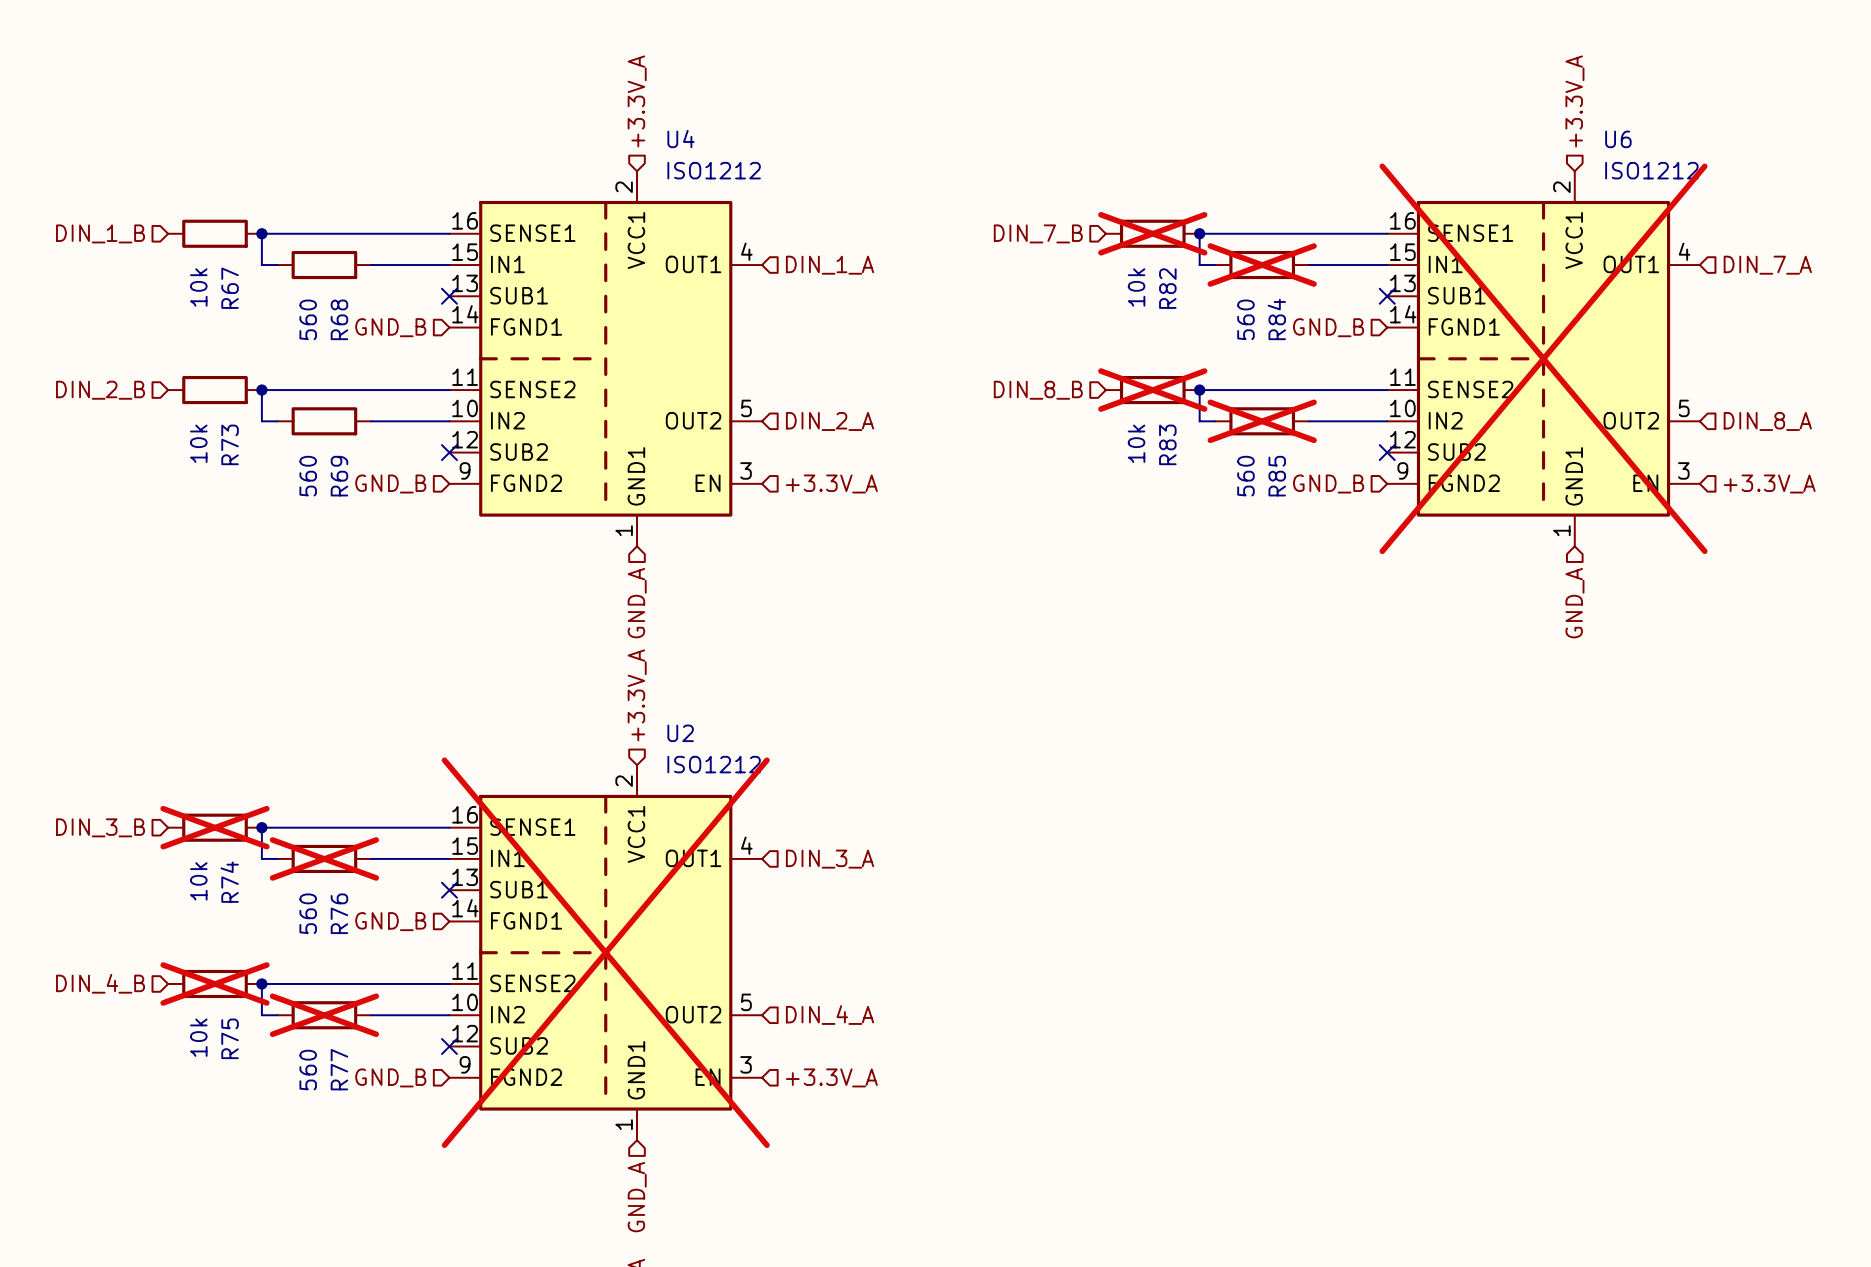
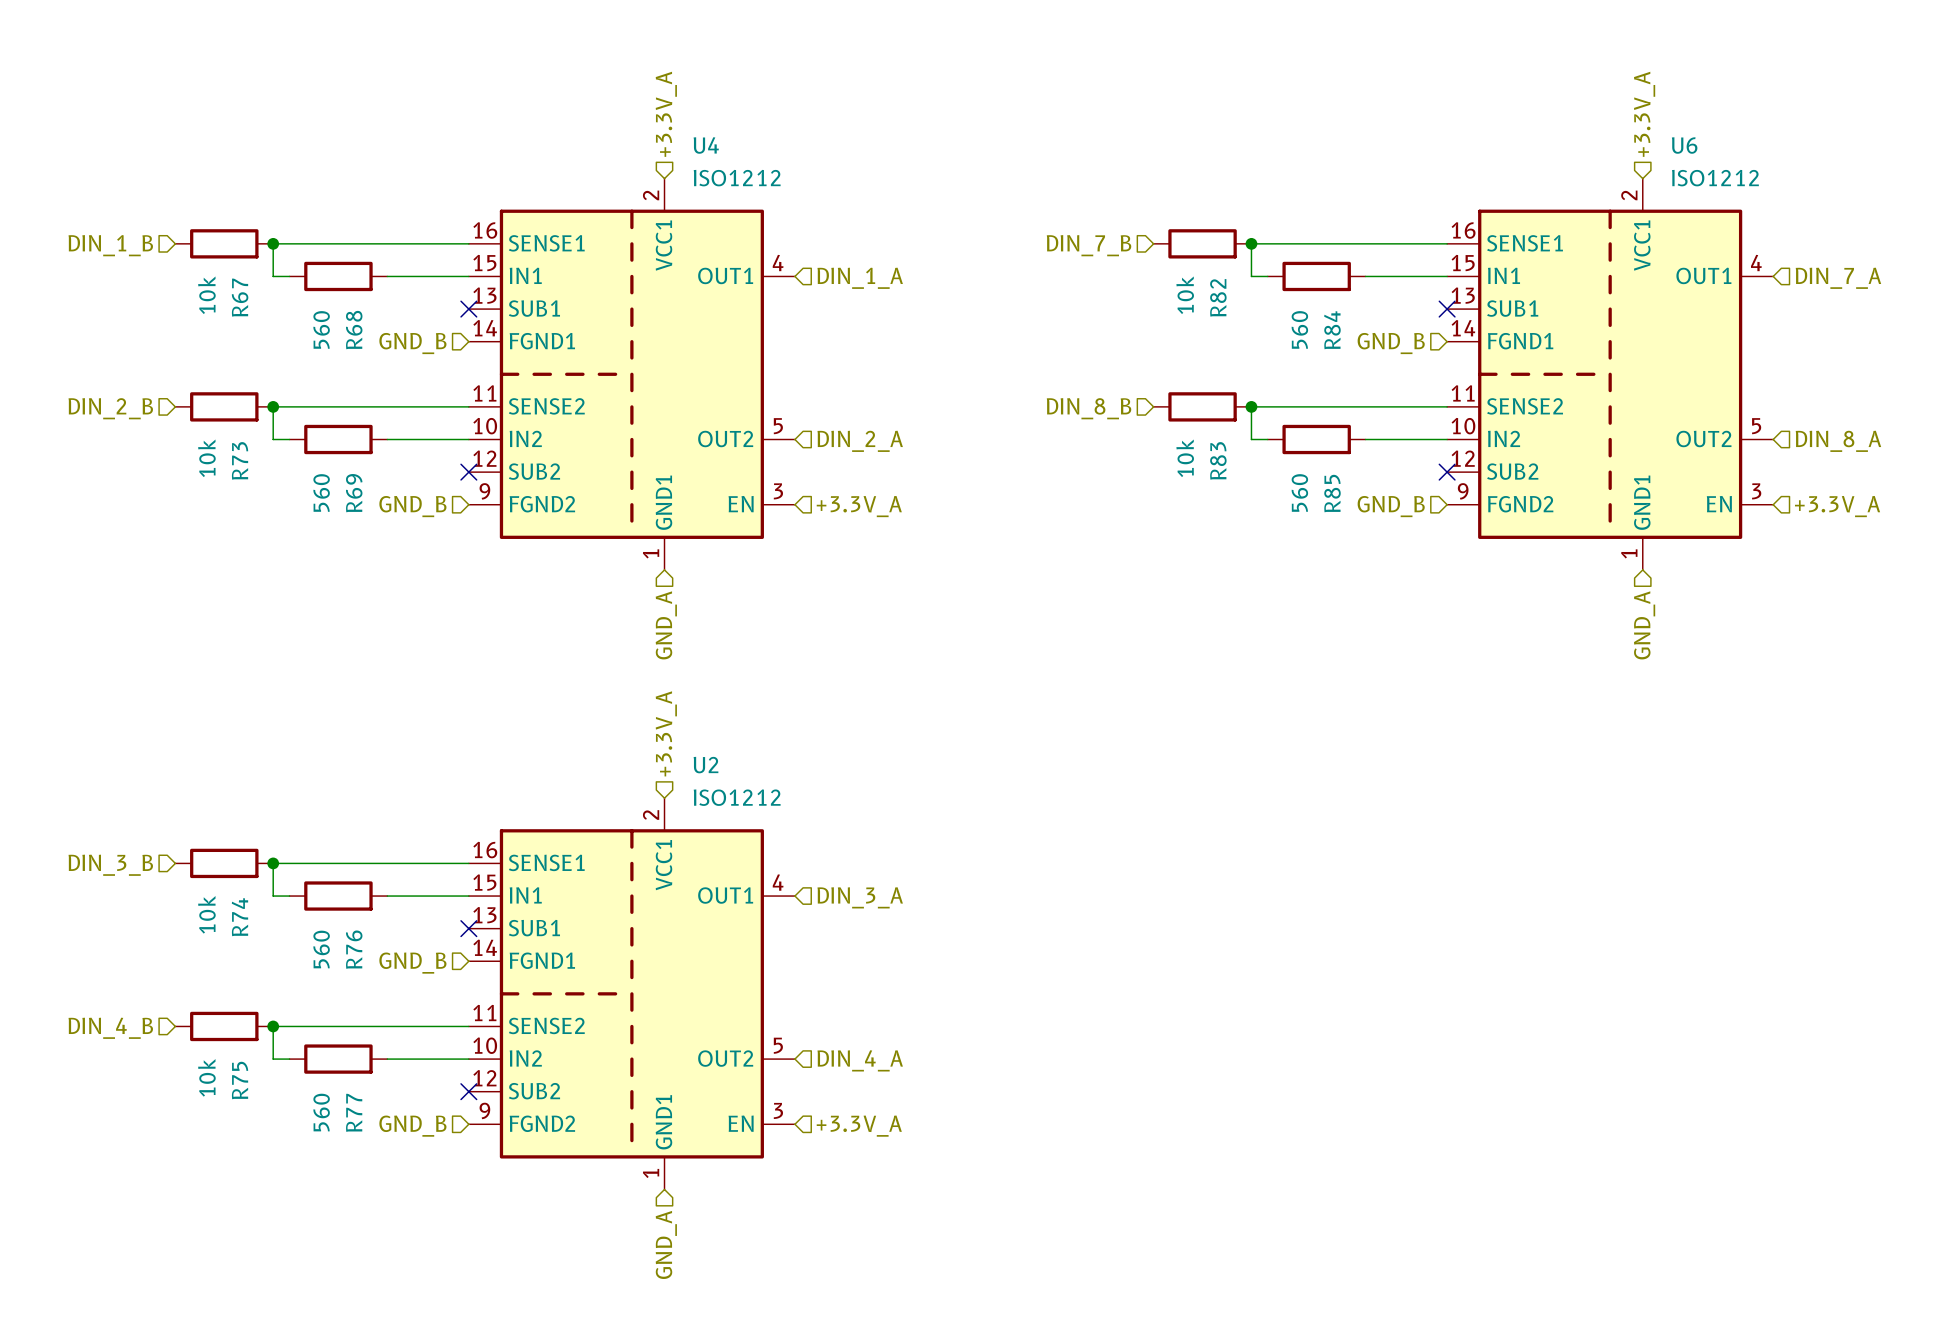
R82 do-not-place cross: (1152, 233) -> none
R84 do-not-place cross: (1262, 265) -> none
U6 do-not-place cross: (1543, 358) -> none
R83 do-not-place cross: (1152, 390) -> none
R85 do-not-place cross: (1262, 421) -> none
R74 do-not-place cross: (215, 827) -> none
R76 do-not-place cross: (324, 858) -> none
U2 do-not-place cross: (605, 952) -> none
R75 do-not-place cross: (215, 983) -> none
R77 do-not-place cross: (324, 1015) -> none

